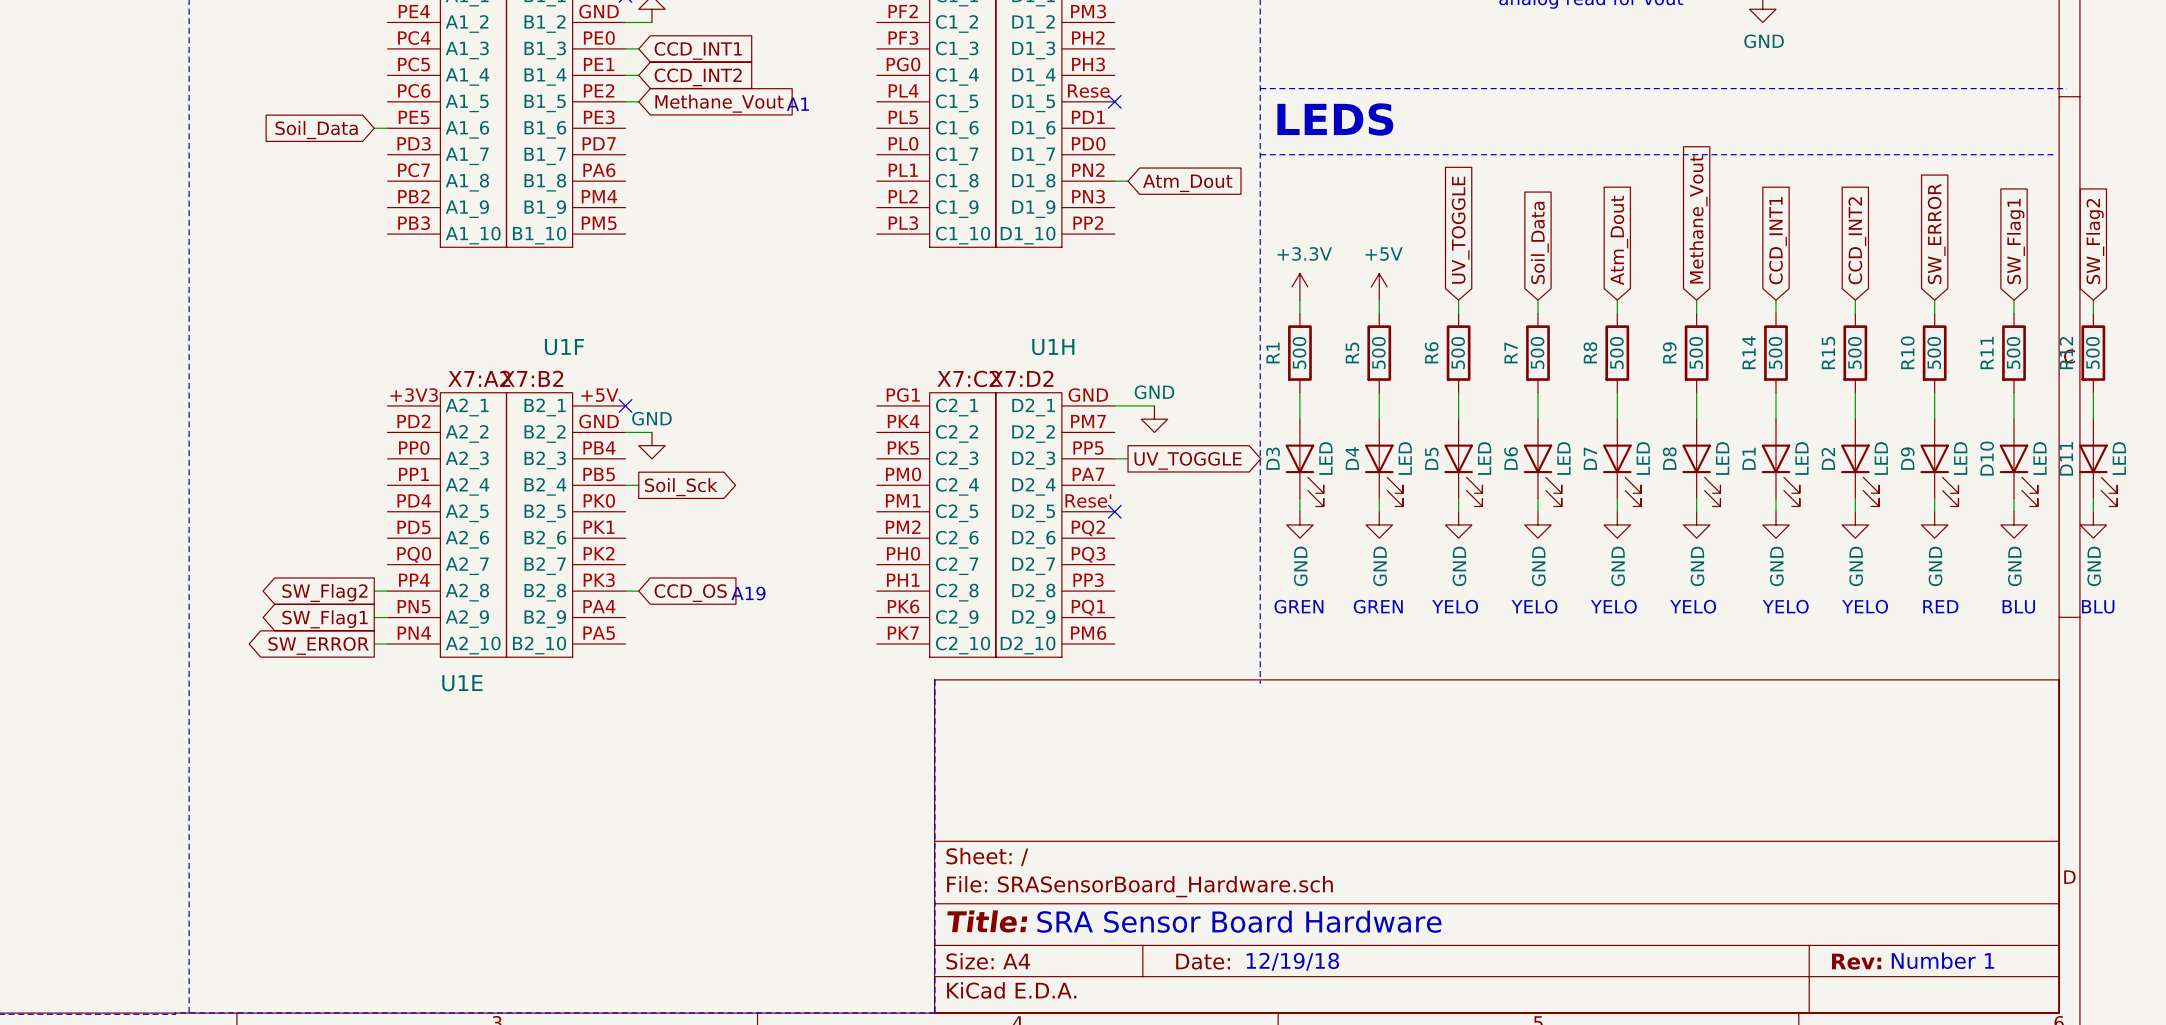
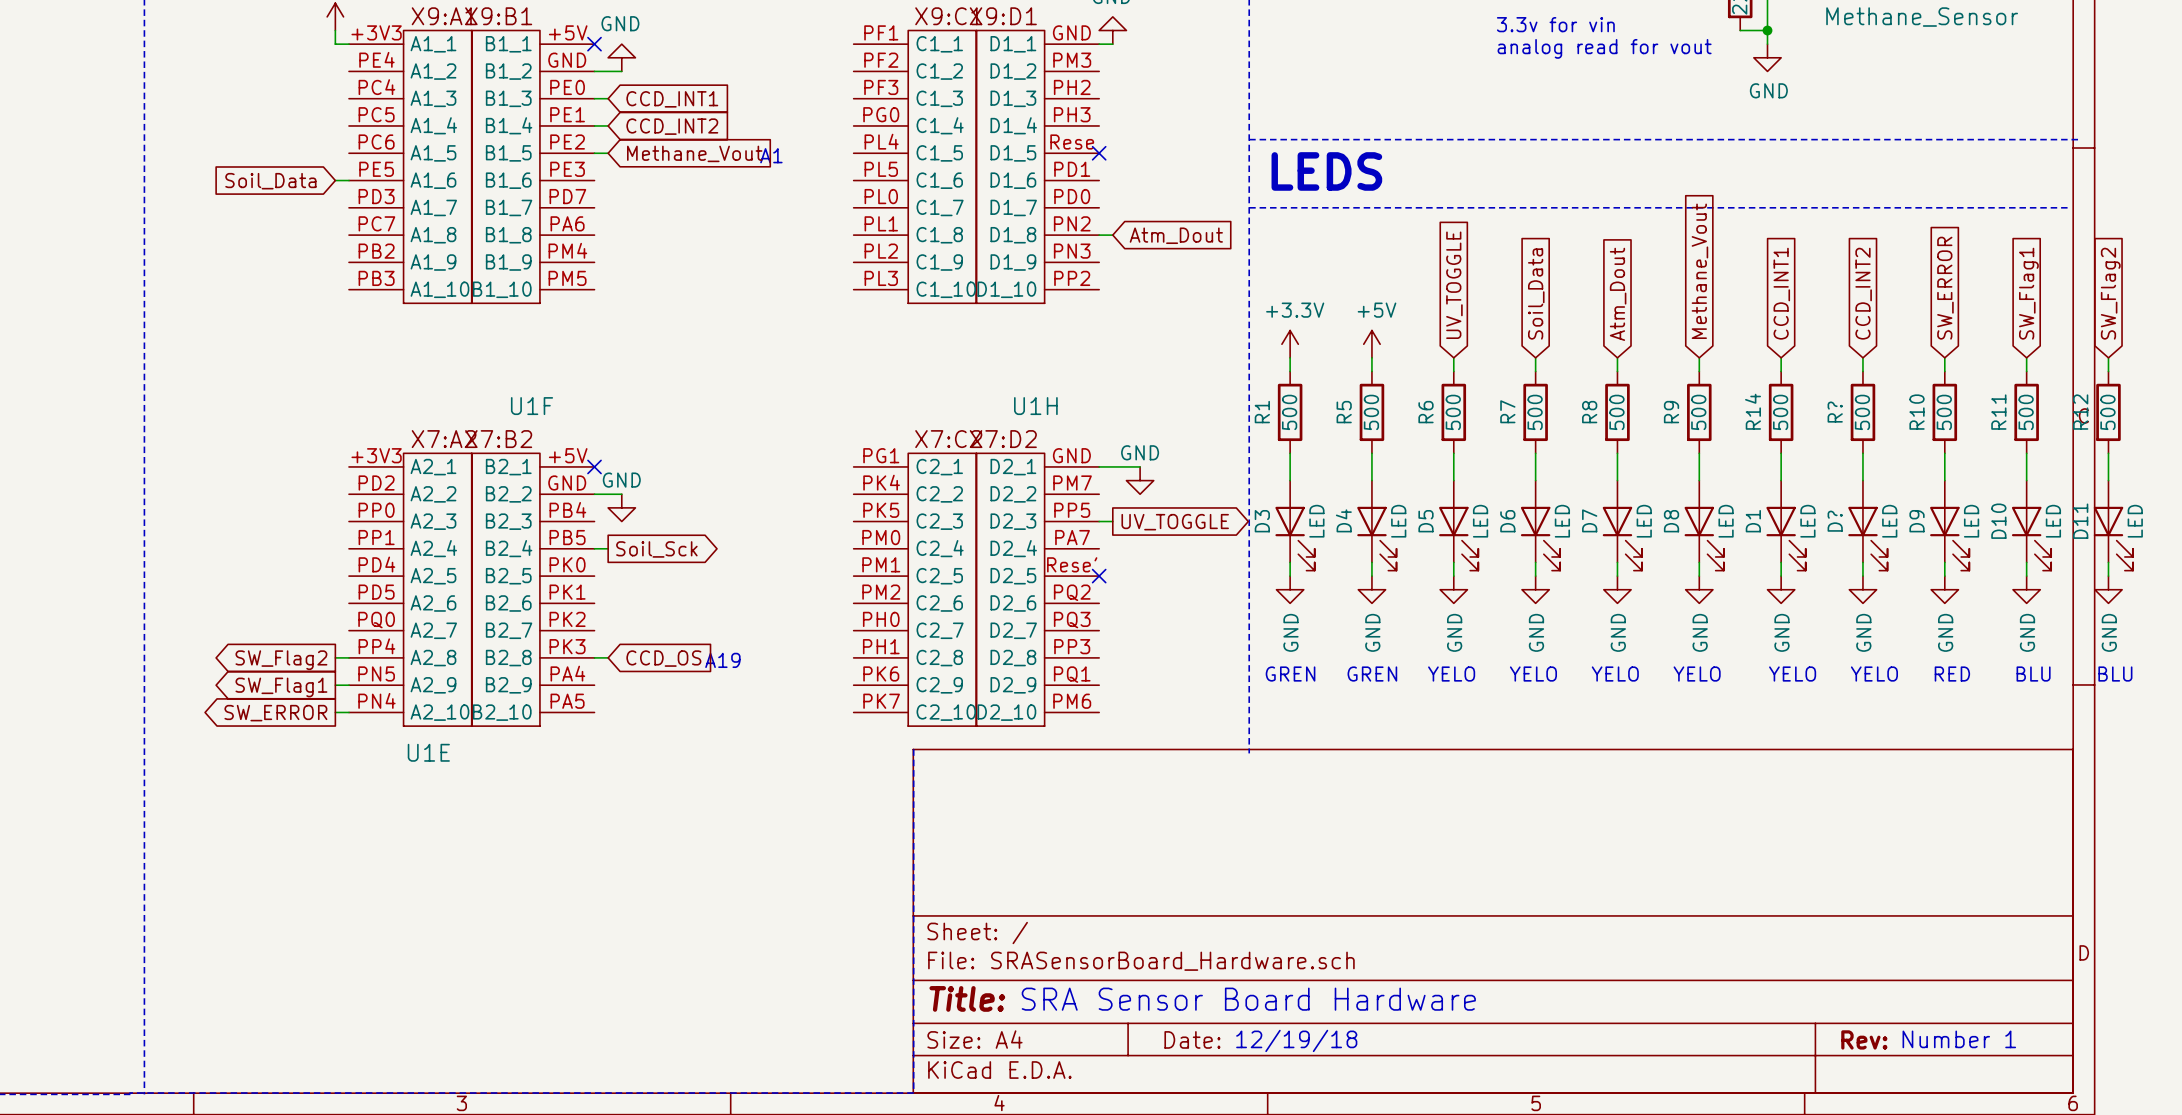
R15 name: R15 (1828, 352) -> R? (1835, 412)
D2 name: D2 (1828, 458) -> D? (1835, 521)

